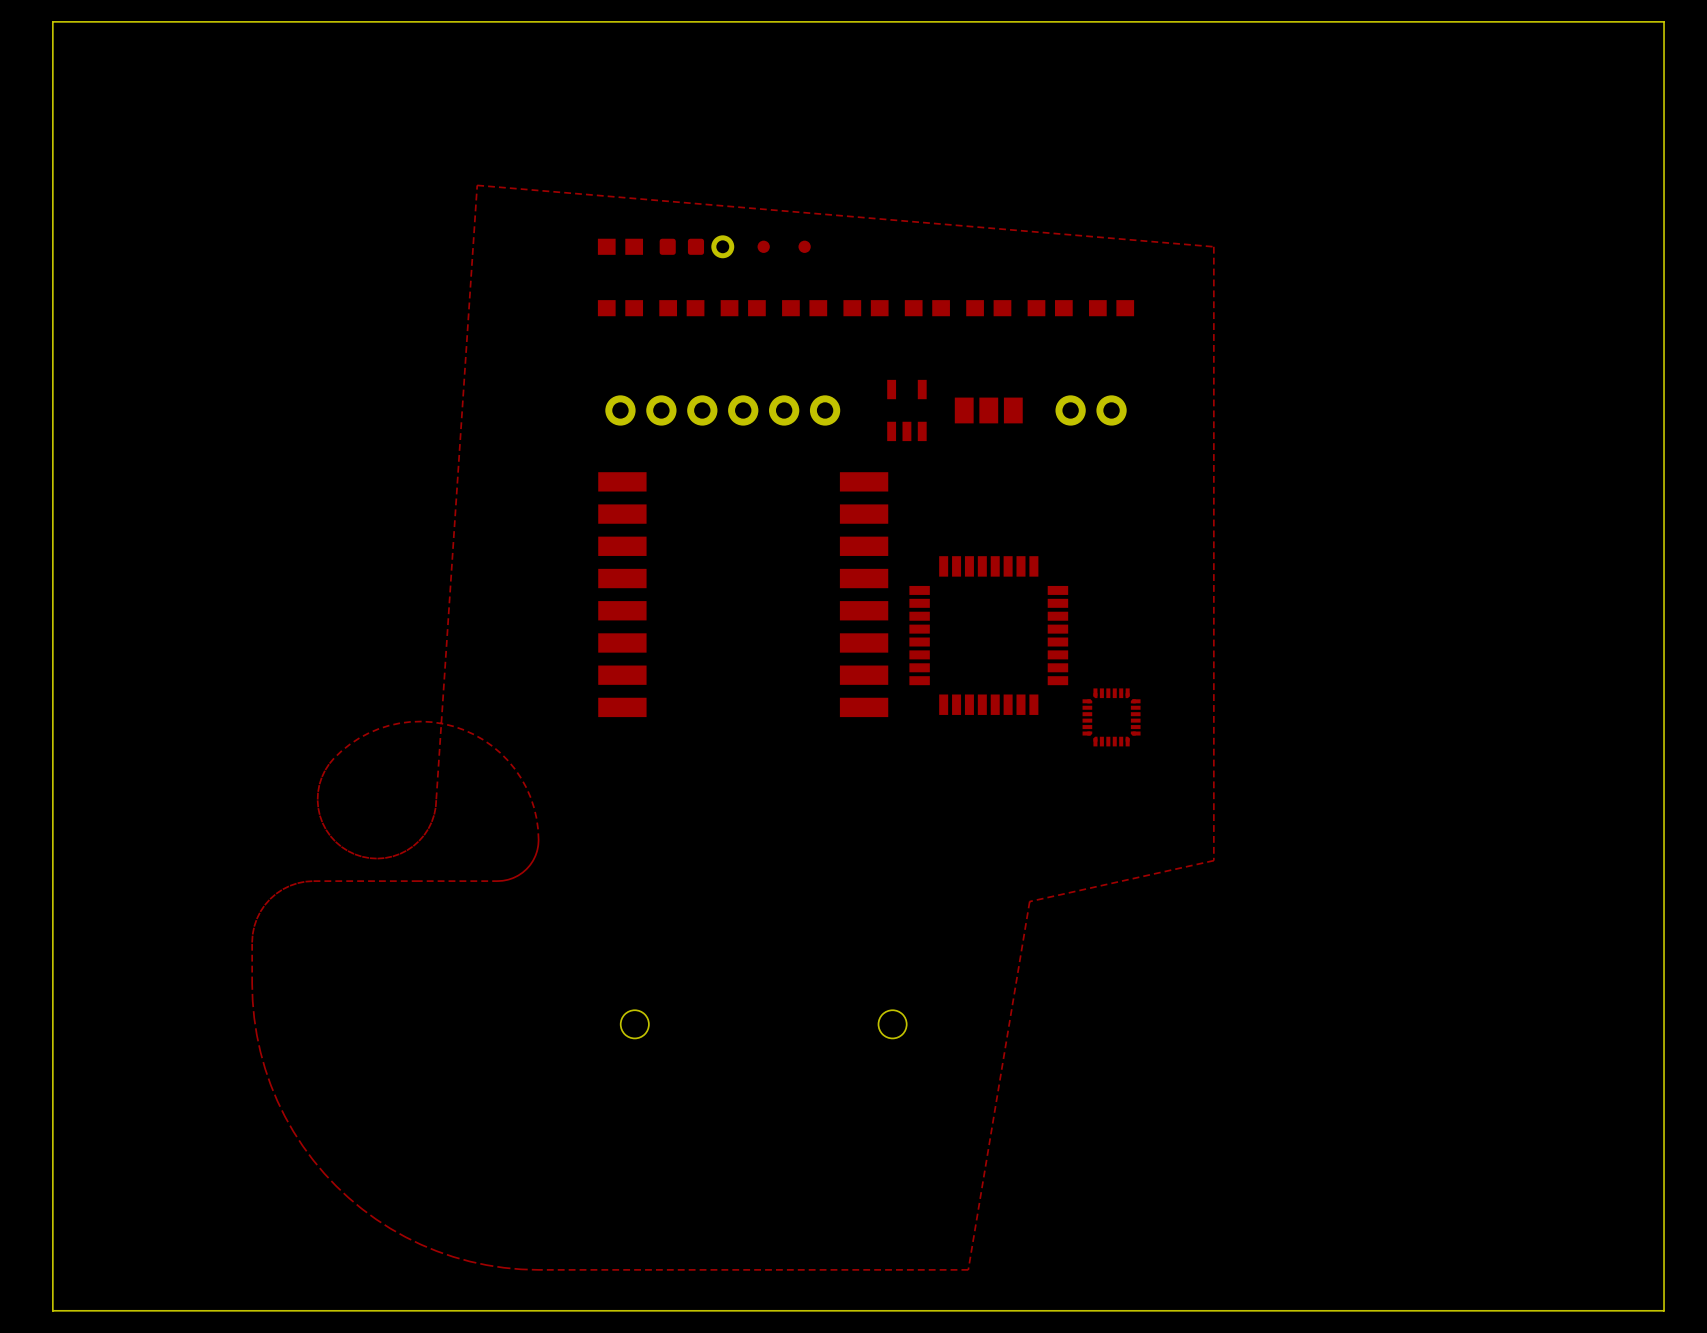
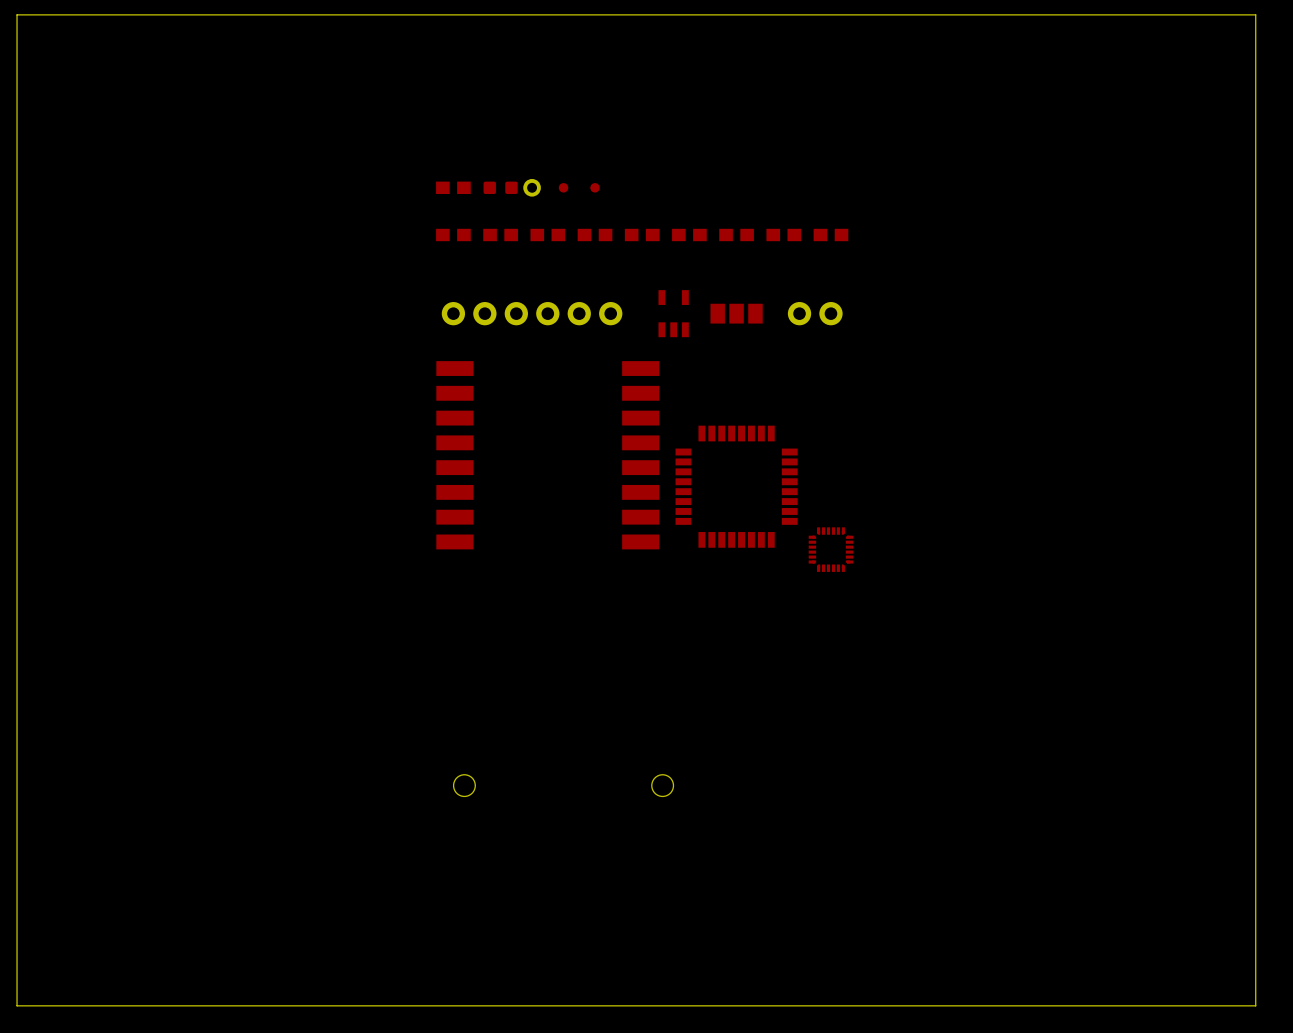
top zone outline: (477, 185) (436, 799) (435, 806) (434, 814) (424, 835) (413, 846) (392, 856) (377, 858) (354, 854) (335, 841) (322, 822) (318, 808) (319, 785) (324, 770) (333, 758) (350, 744) (369, 732) (389, 725) (421, 721) (432, 722) (443, 723) (464, 729) (483, 739) (500, 753) (515, 769) (526, 787) (534, 807) (538, 829) (537, 850) (526, 869) (513, 877) (503, 880) (305, 881) (290, 885) (270, 899) (256, 919) (252, 934) (252, 1000) (260, 1051) (277, 1100) (293, 1131) (313, 1160) (348, 1197) (375, 1219) (405, 1237) (437, 1251) (470, 1261) (504, 1267) (538, 1269) (968, 1269) (1029, 901) (1213, 860) (1213, 246) (477, 185) -> none

